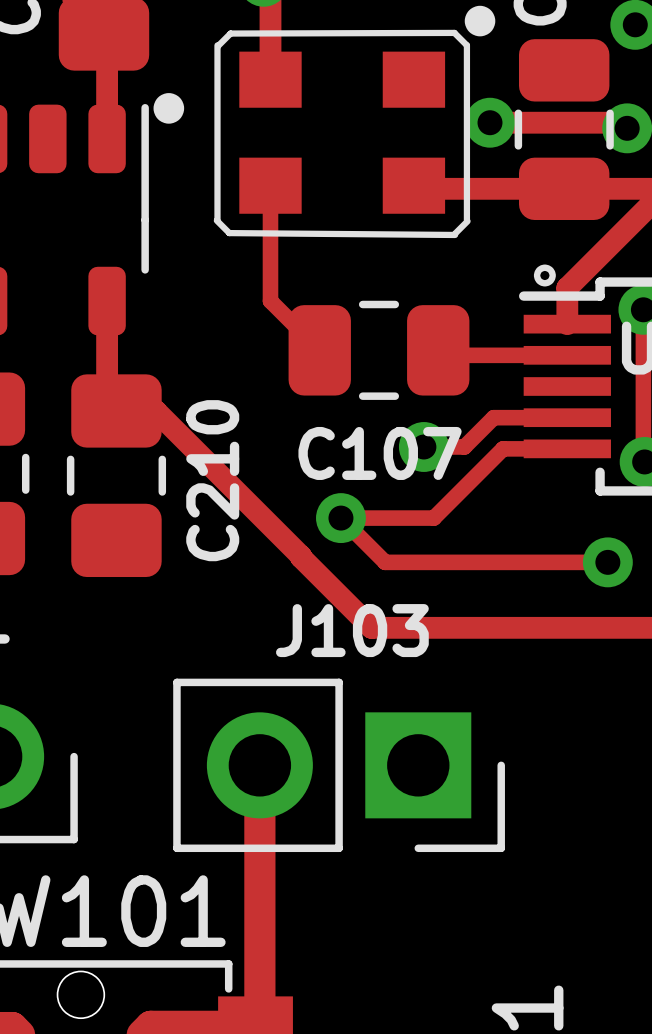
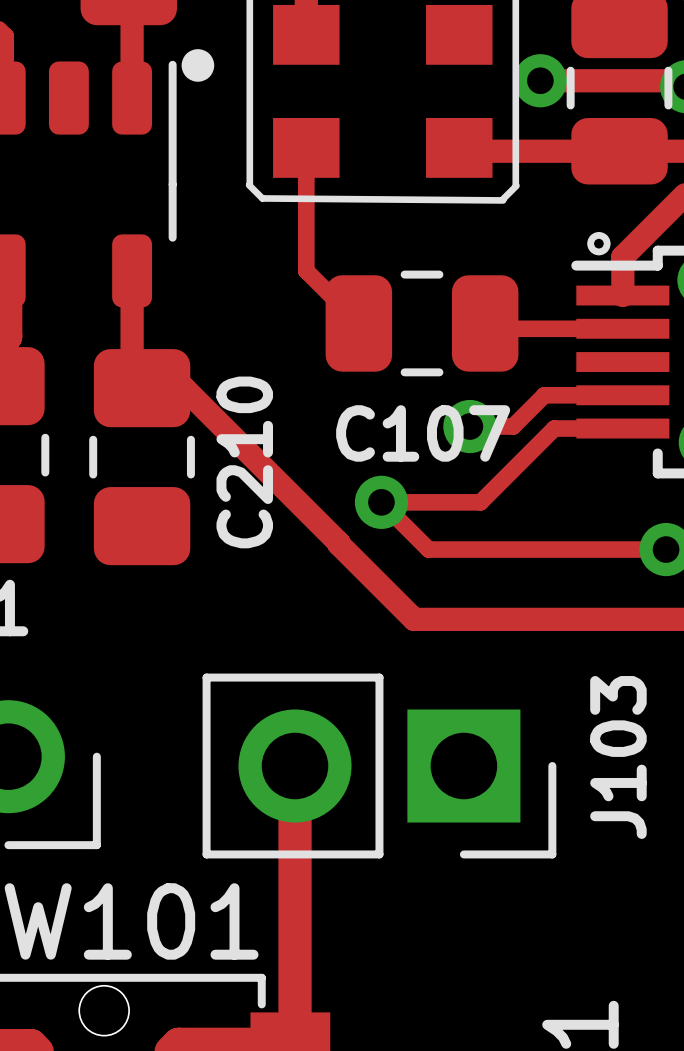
J103 name rotation: 0° (352, 630) -> 90° counterclockwise (618, 757)
J103 name position: J103 (352, 630) -> J103 (618, 757)

